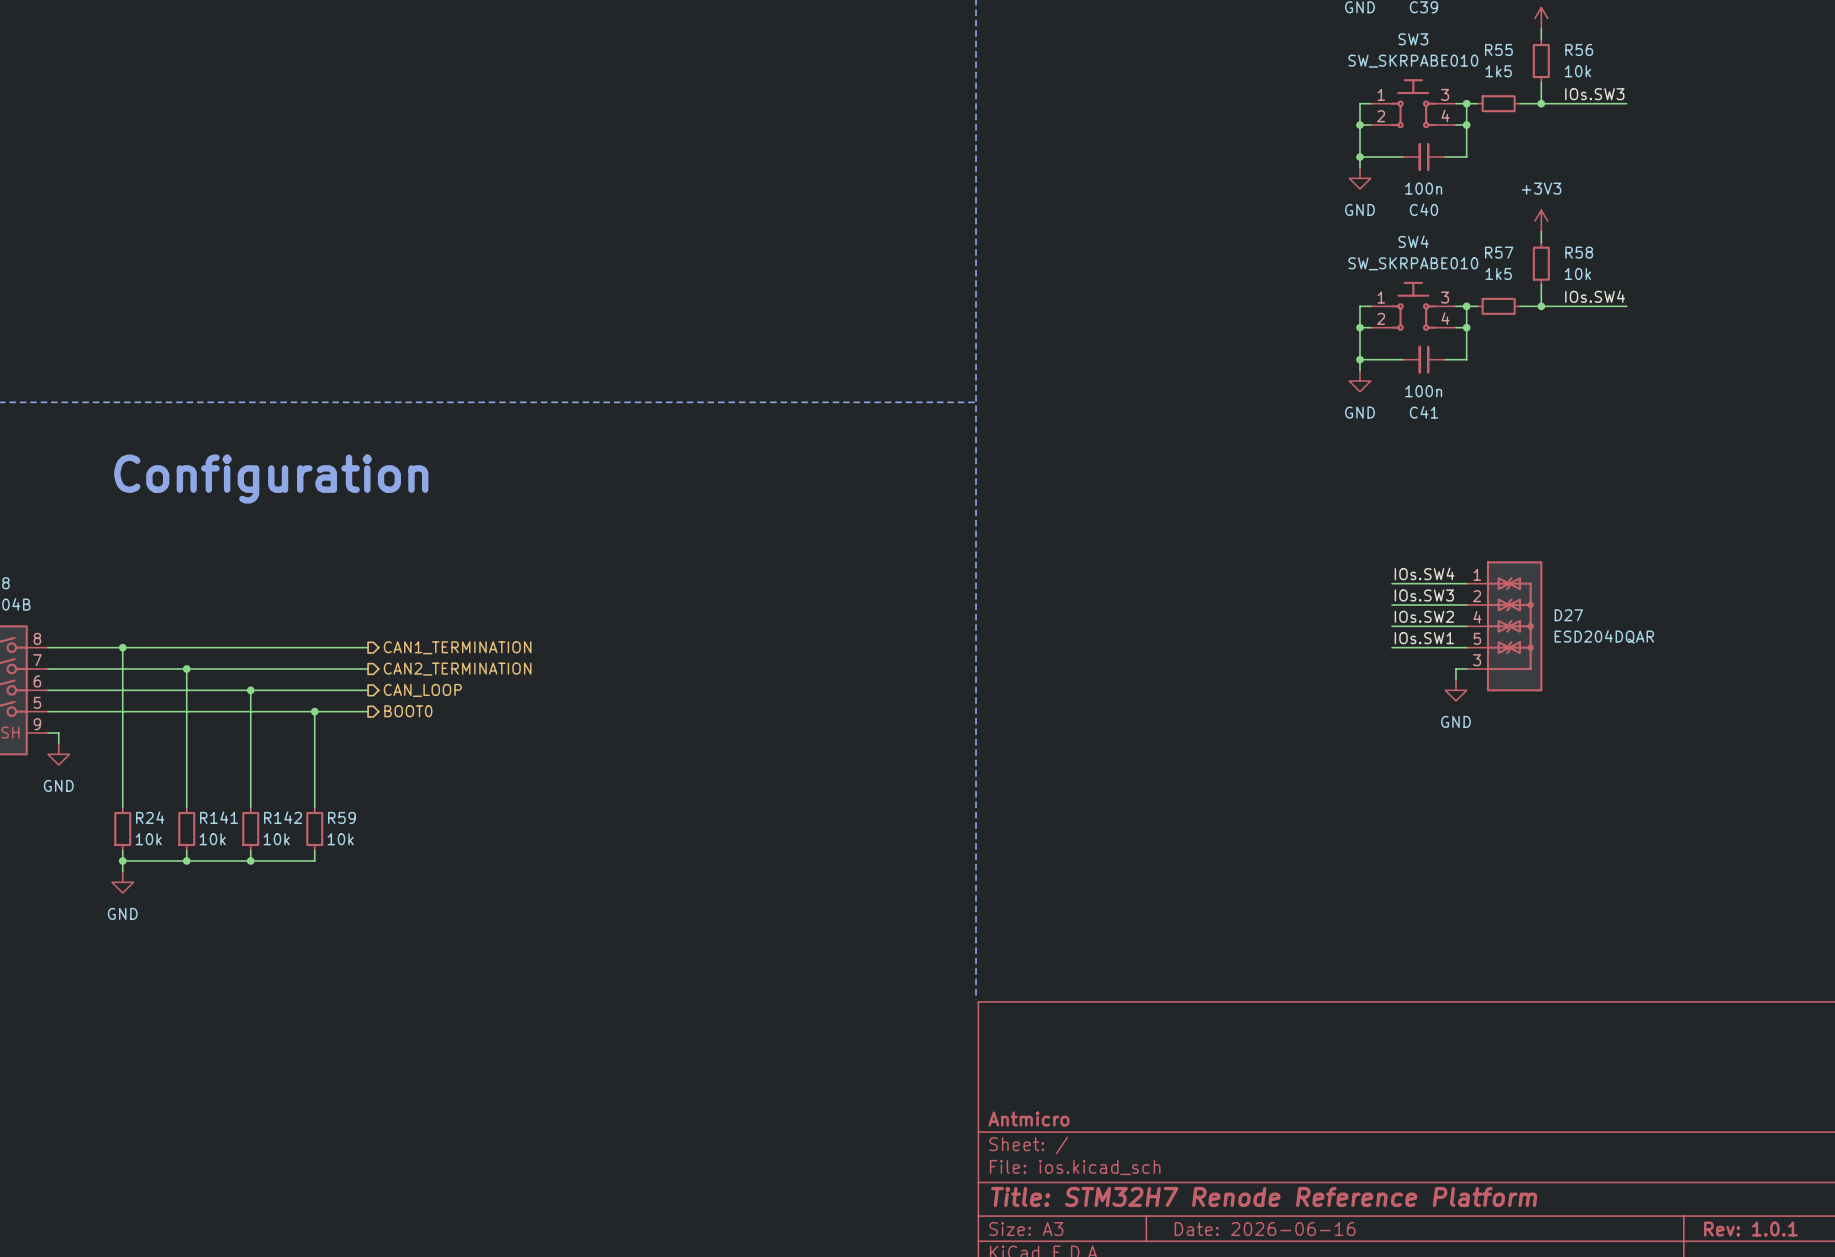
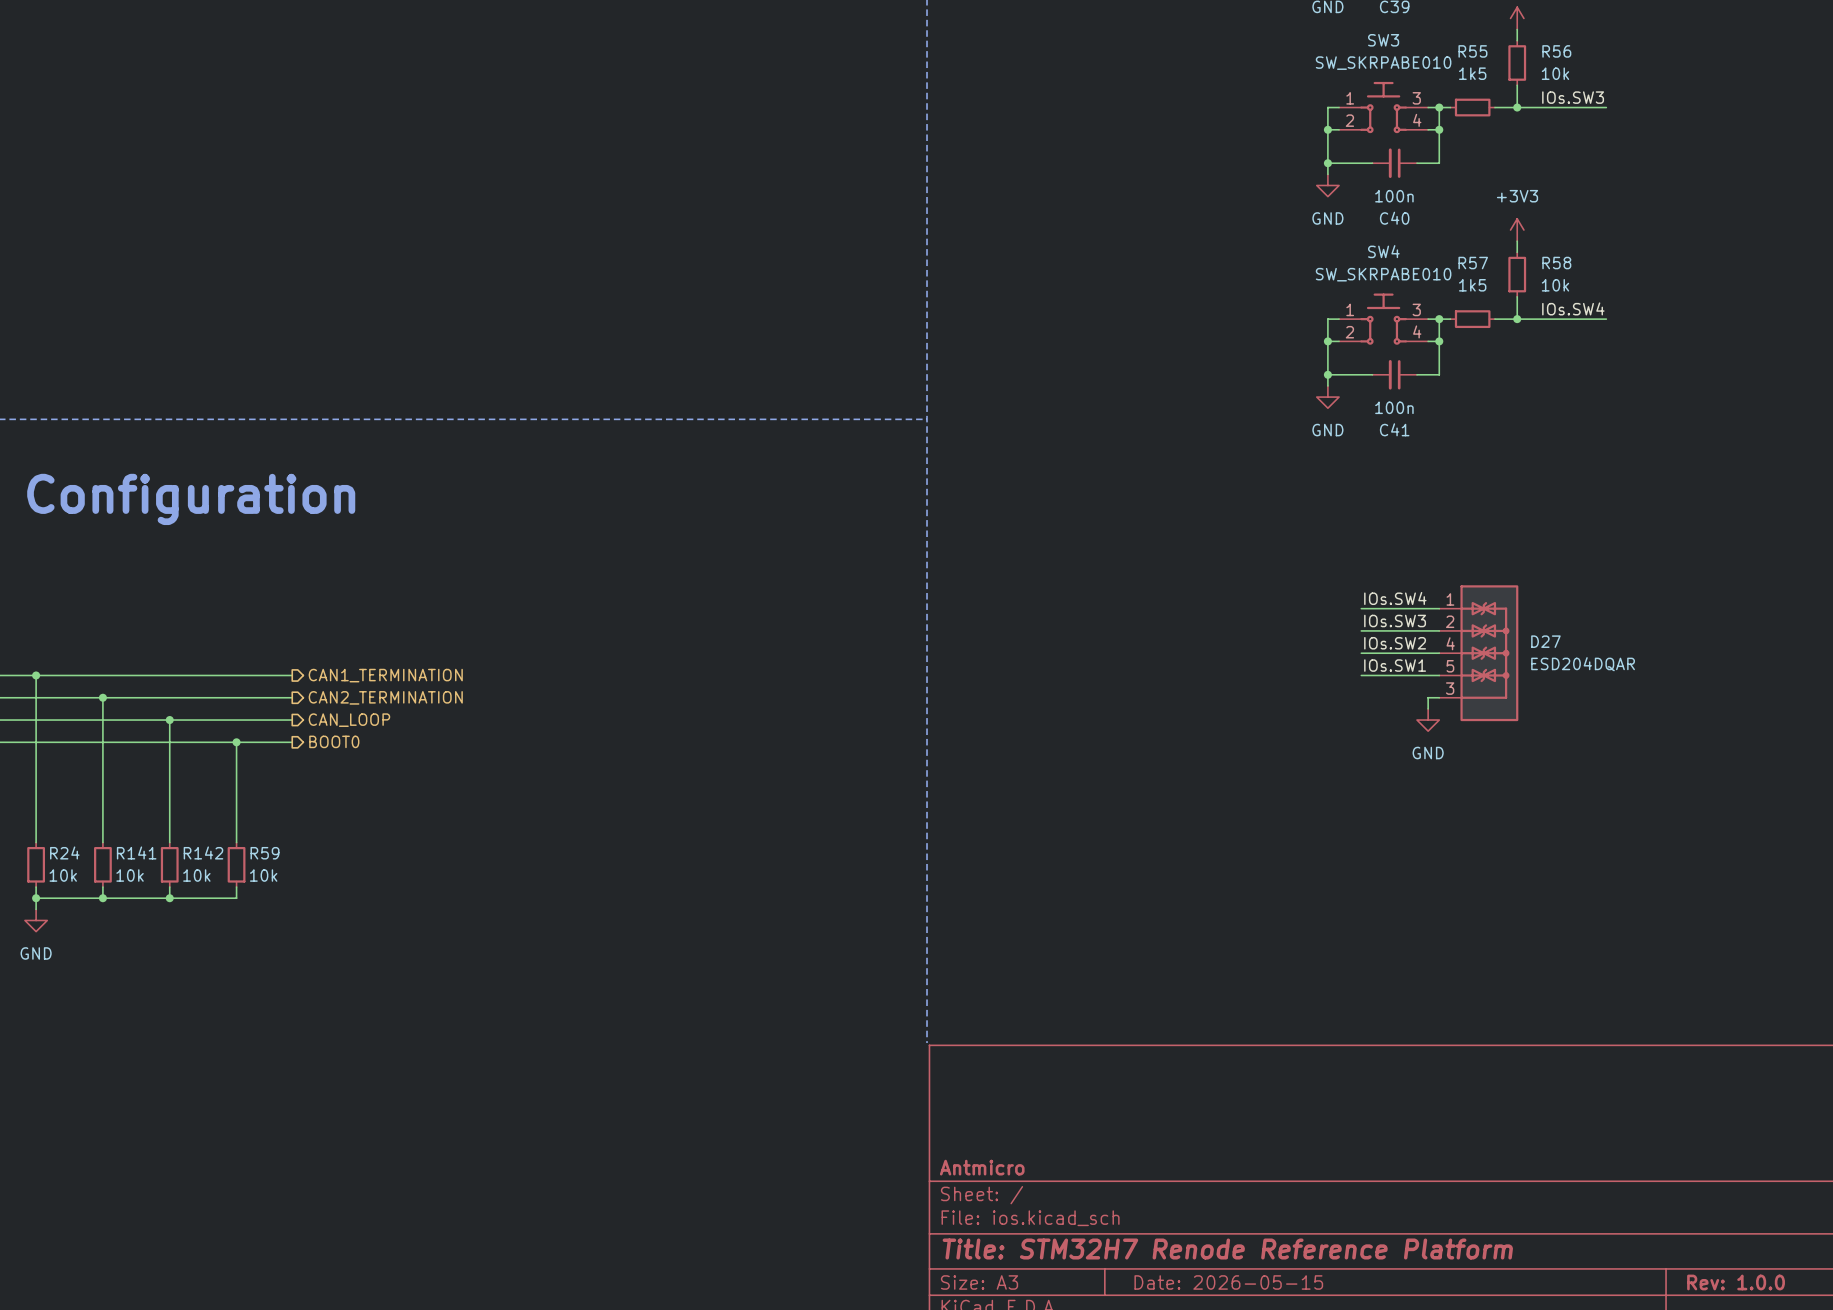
title block: Date: 2026-06-16 (1265, 1229) -> Date: 2026-05-15 (1228, 1282)
title block: Rev: 1.0.1 (1750, 1229) -> Rev: 1.0.0 (1736, 1282)

